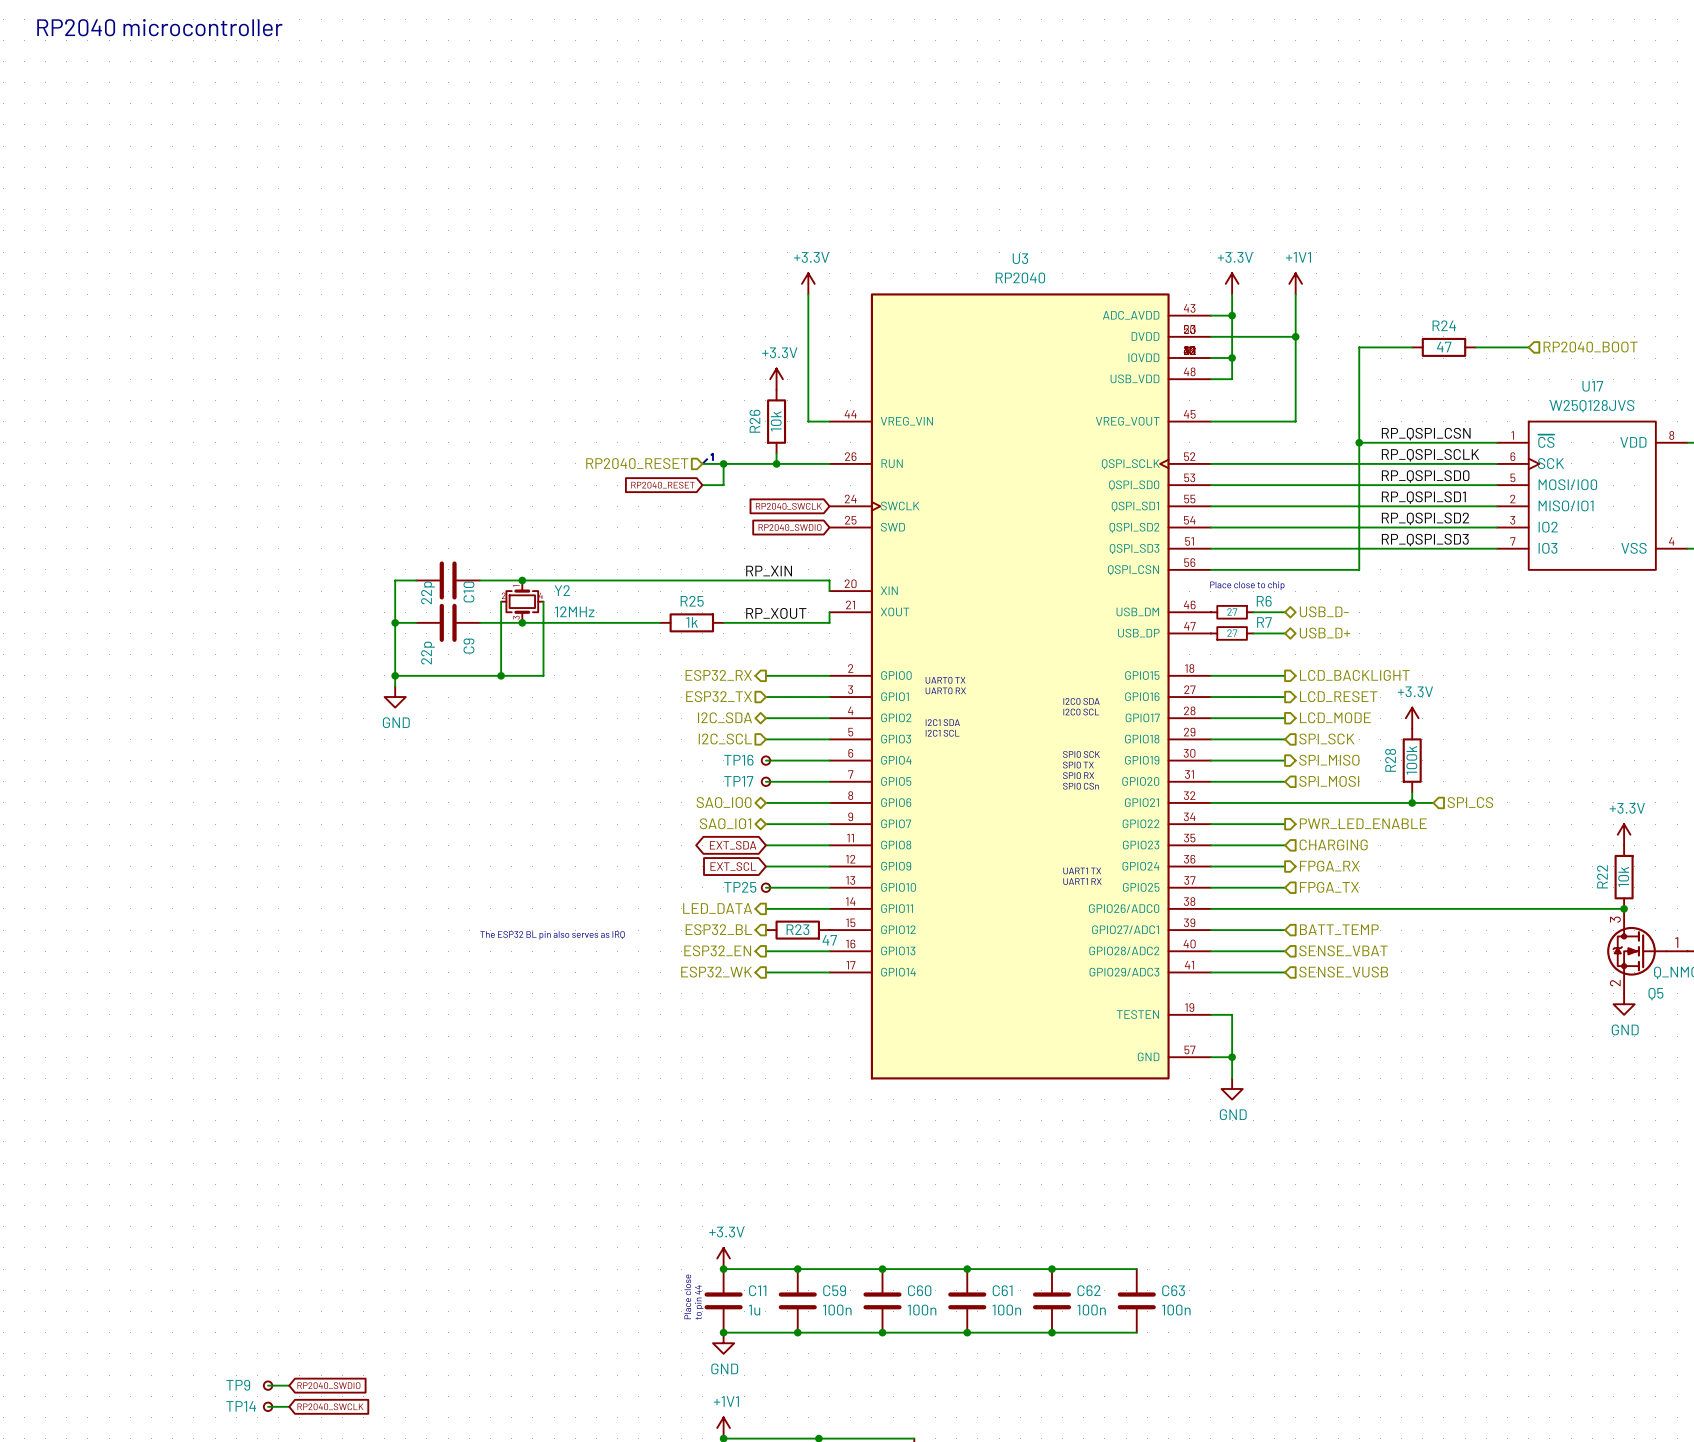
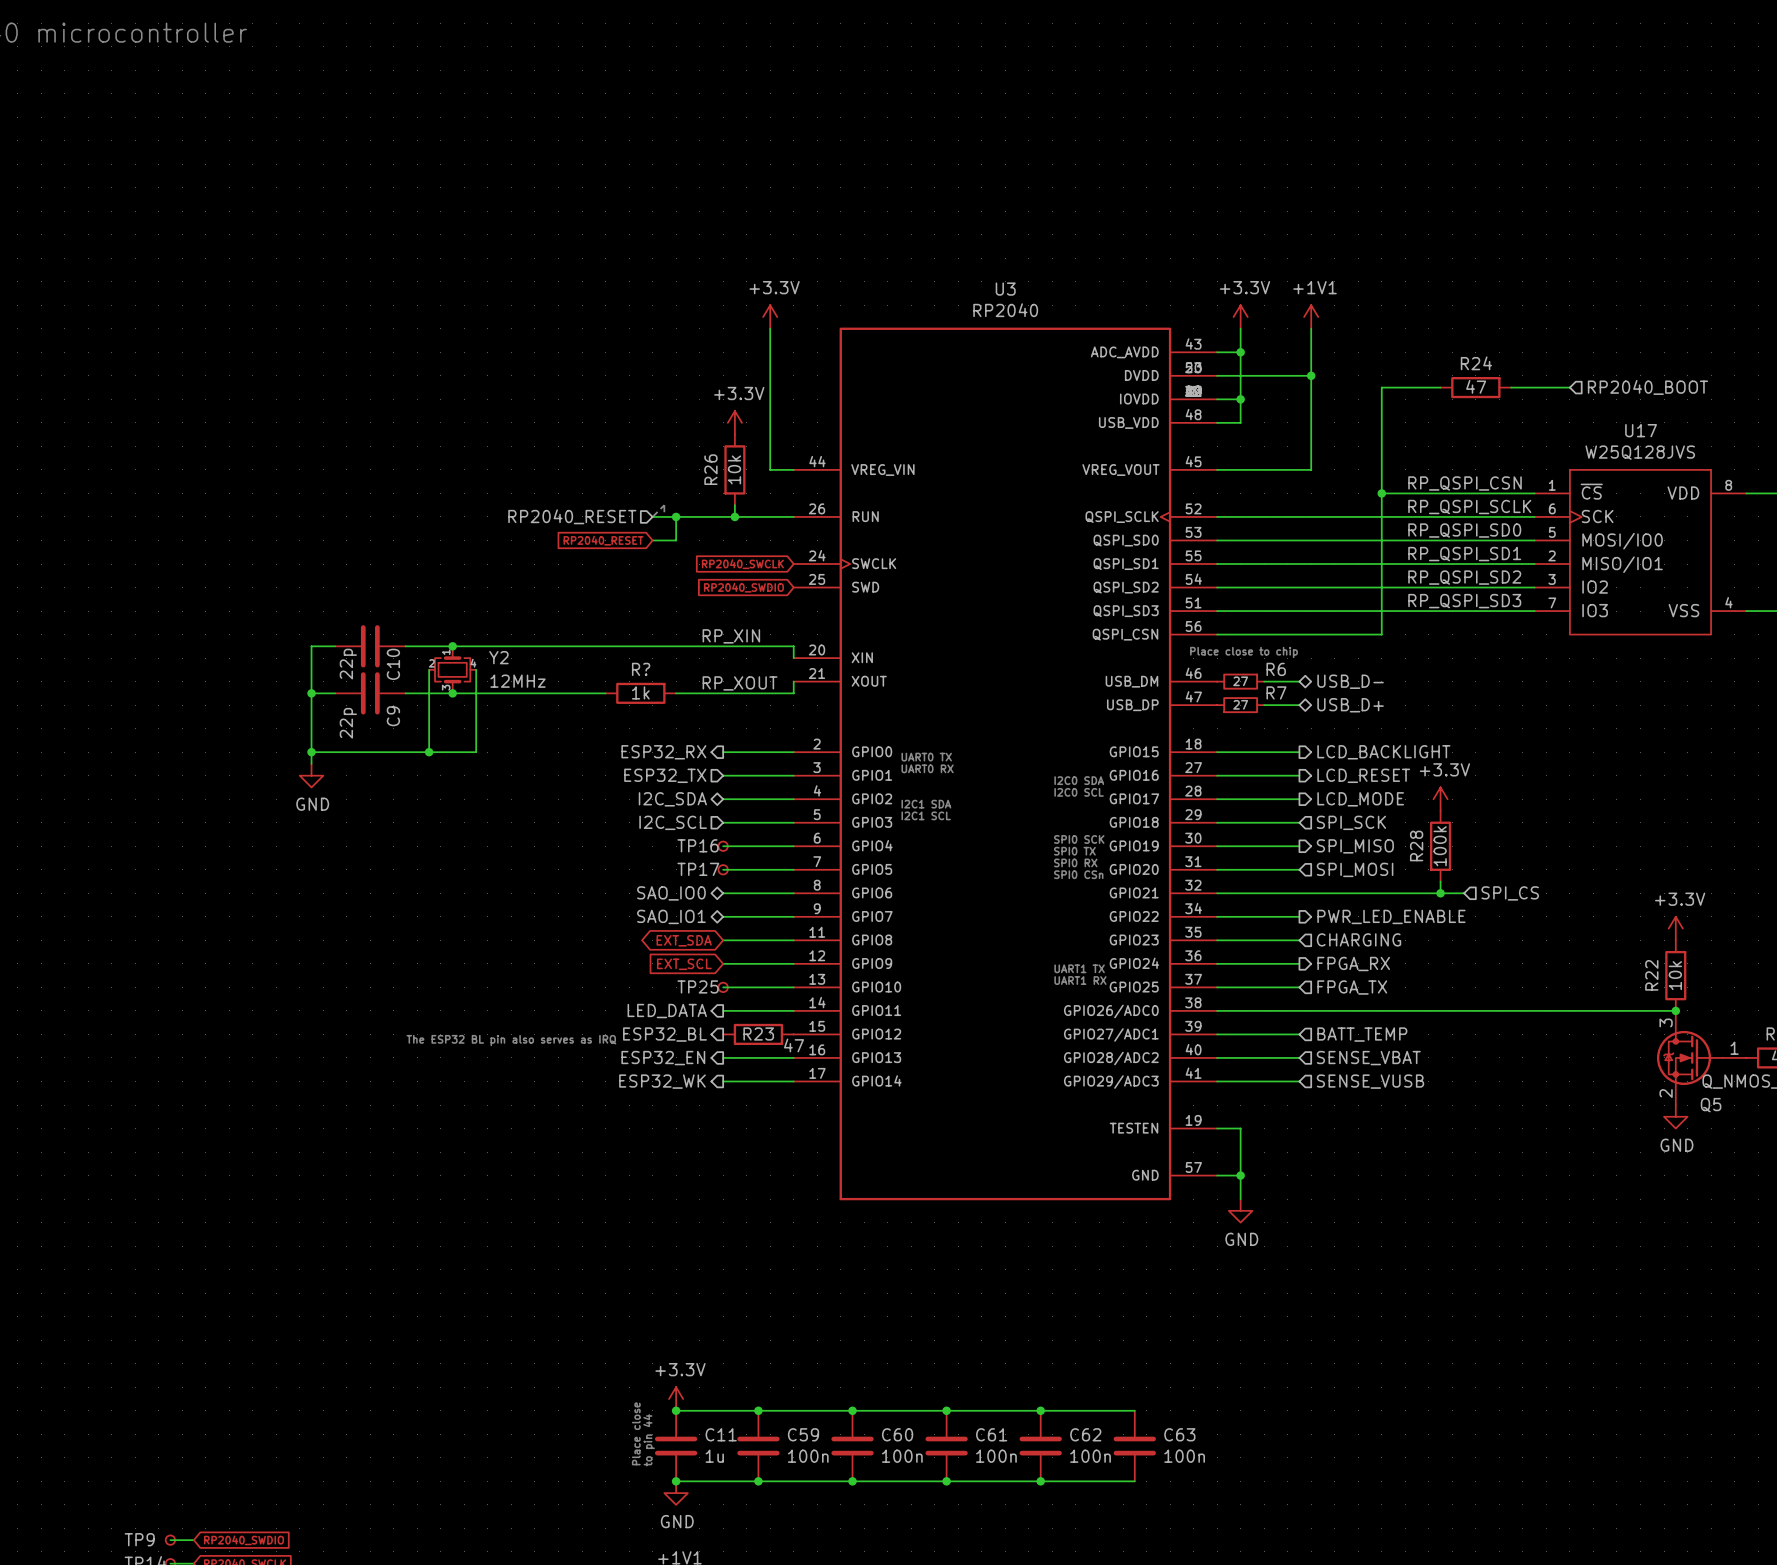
R25 name: R25 (692, 601) -> R? (641, 669)

